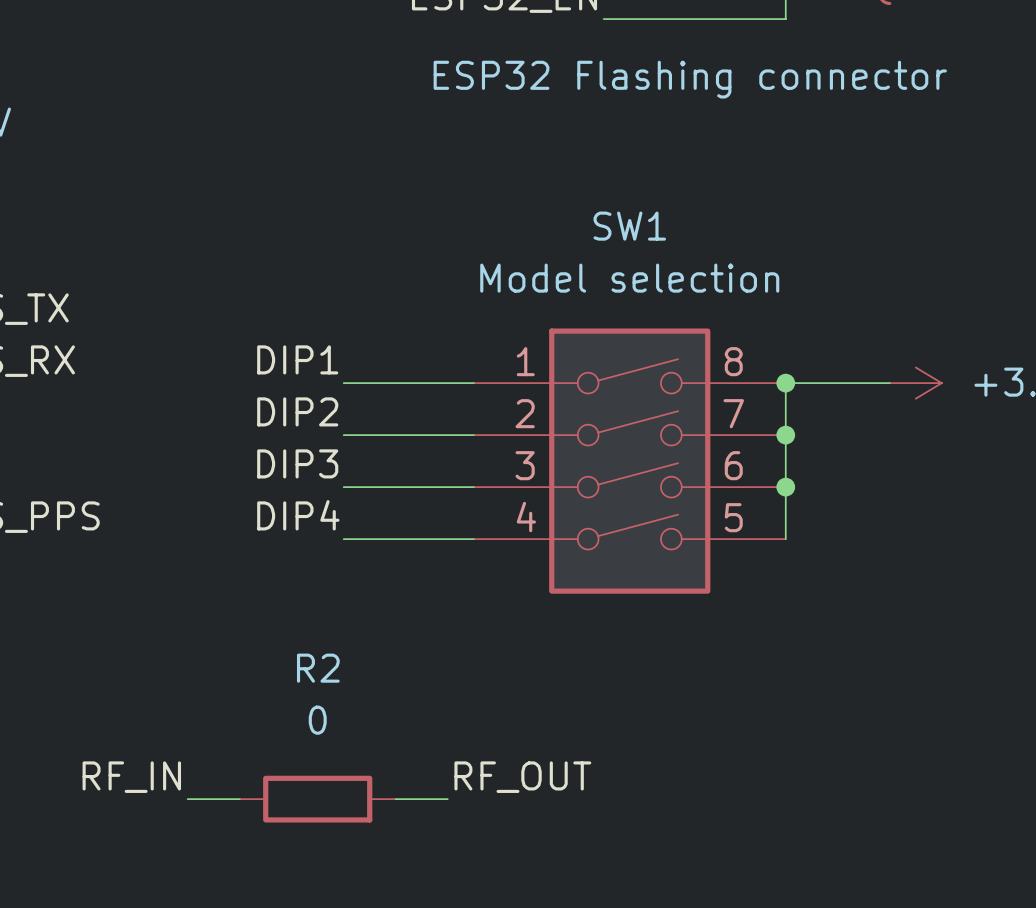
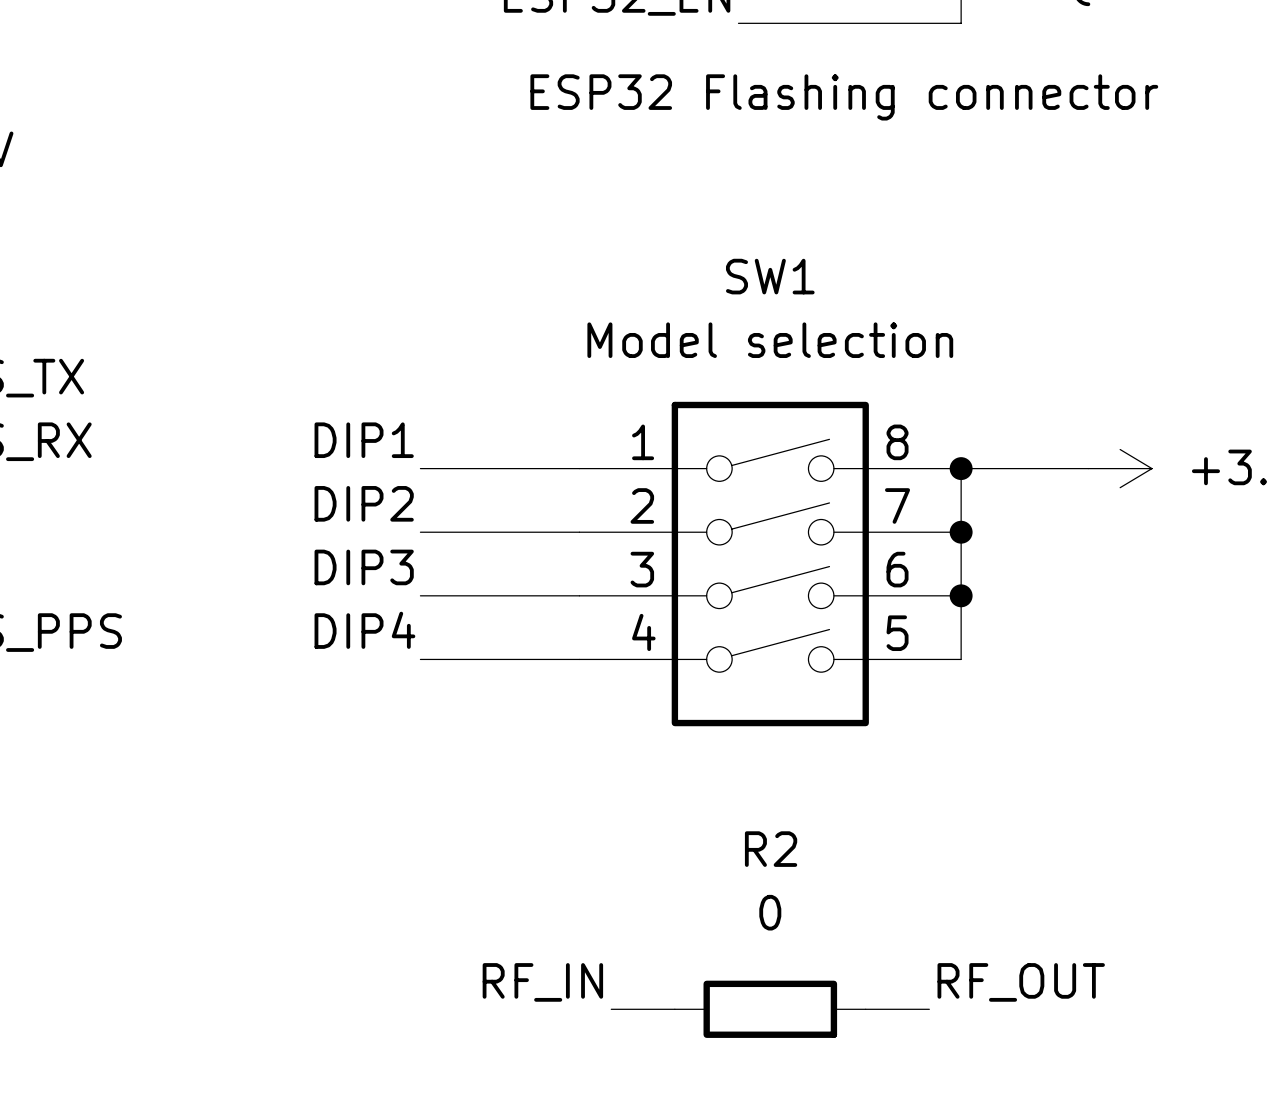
label position: RF_IN (131, 777) -> RF_IN (542, 982)
label position: RF_OUT (522, 777) -> RF_OUT (1021, 982)
wire: (187, 799) (239, 799) -> (611, 1009) (674, 1009)
R2 position: (317, 799) -> (770, 1009)
wire: (395, 799) (447, 799) -> (865, 1009) (929, 1009)

